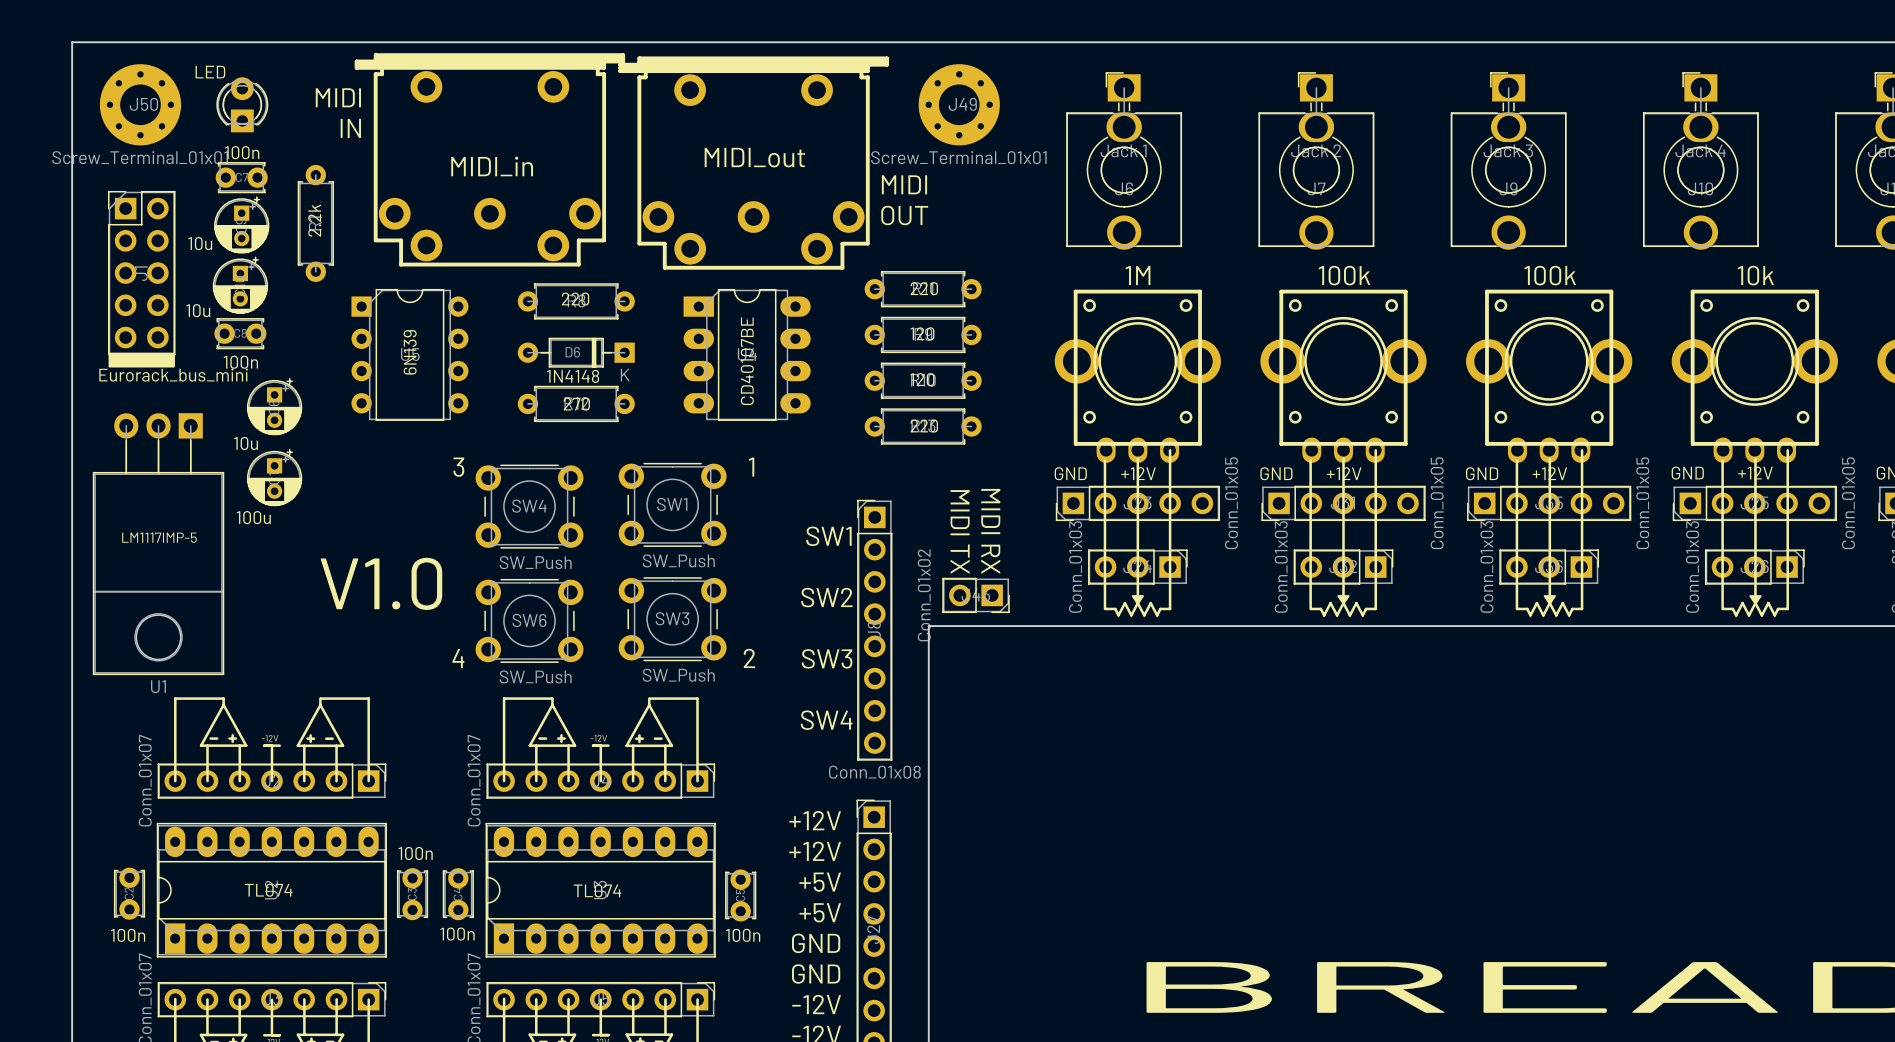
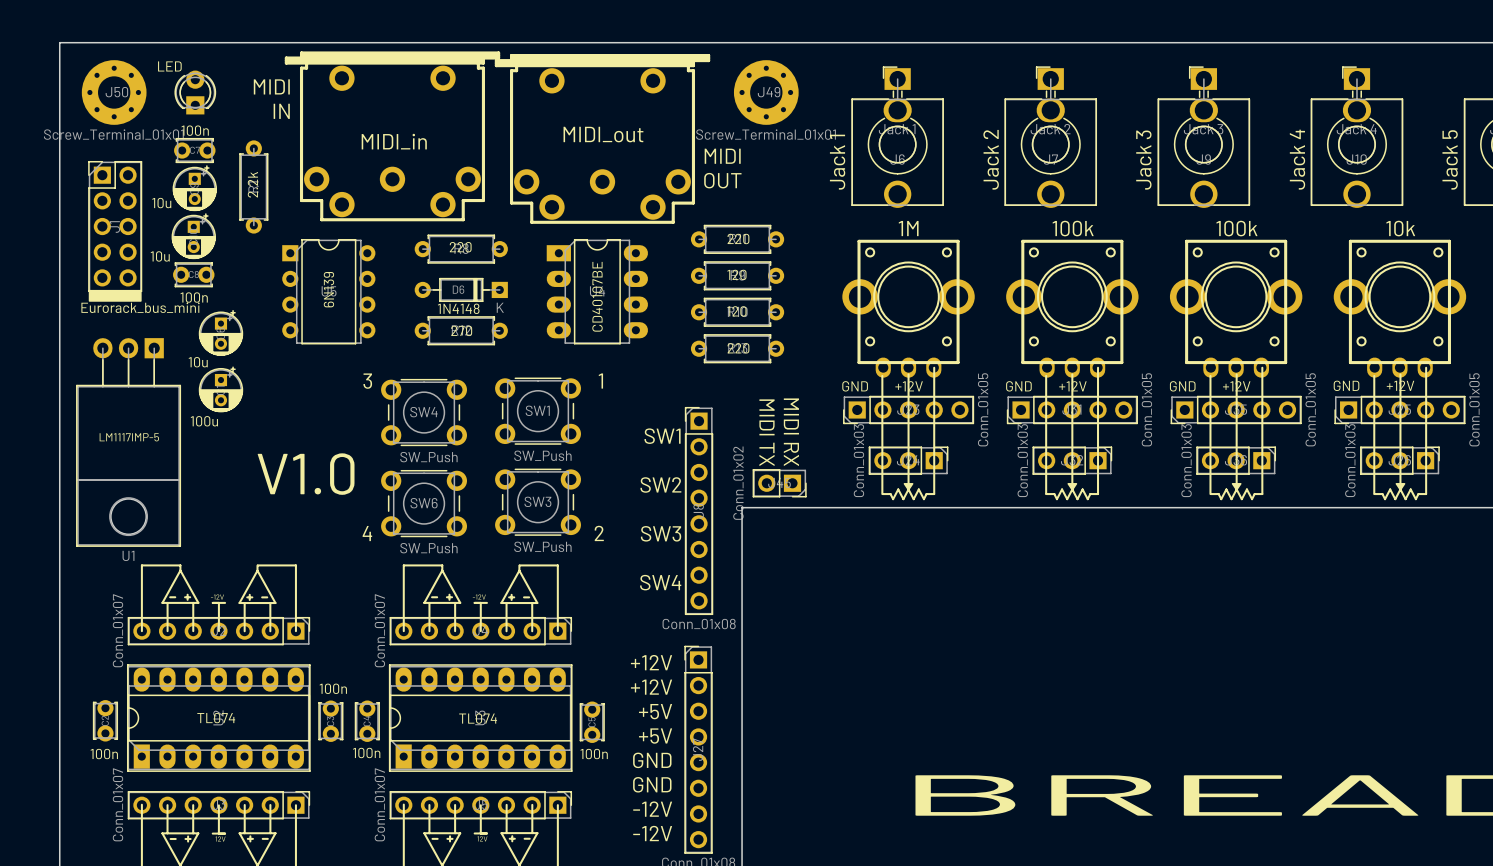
text: none -> Jack 2 (991, 159)
text: none -> Jack 3 (1143, 160)
text: none -> Jack 4 (1297, 159)
text: none -> Jack 5 (1450, 159)
text: none -> Jack 1 (837, 162)

